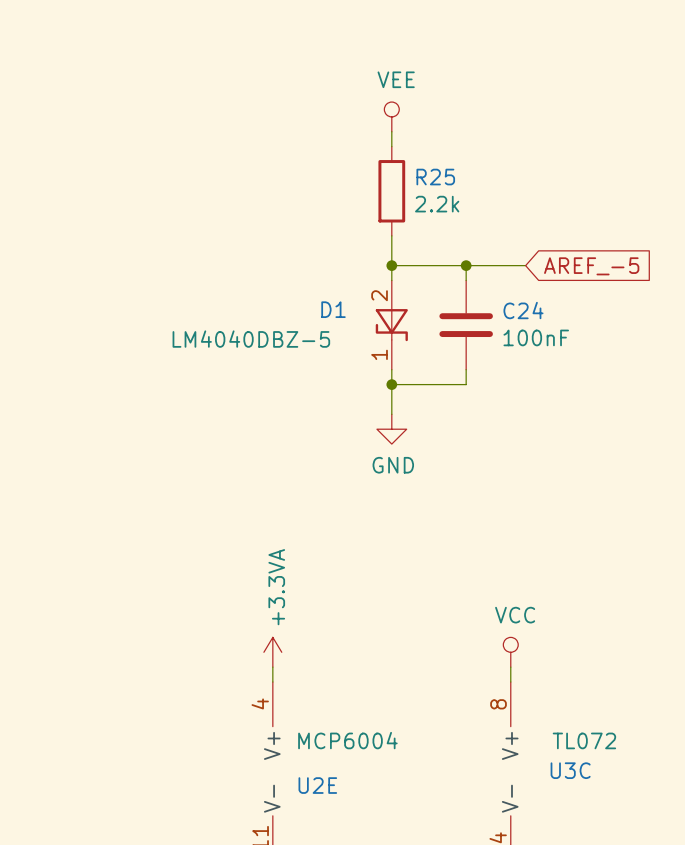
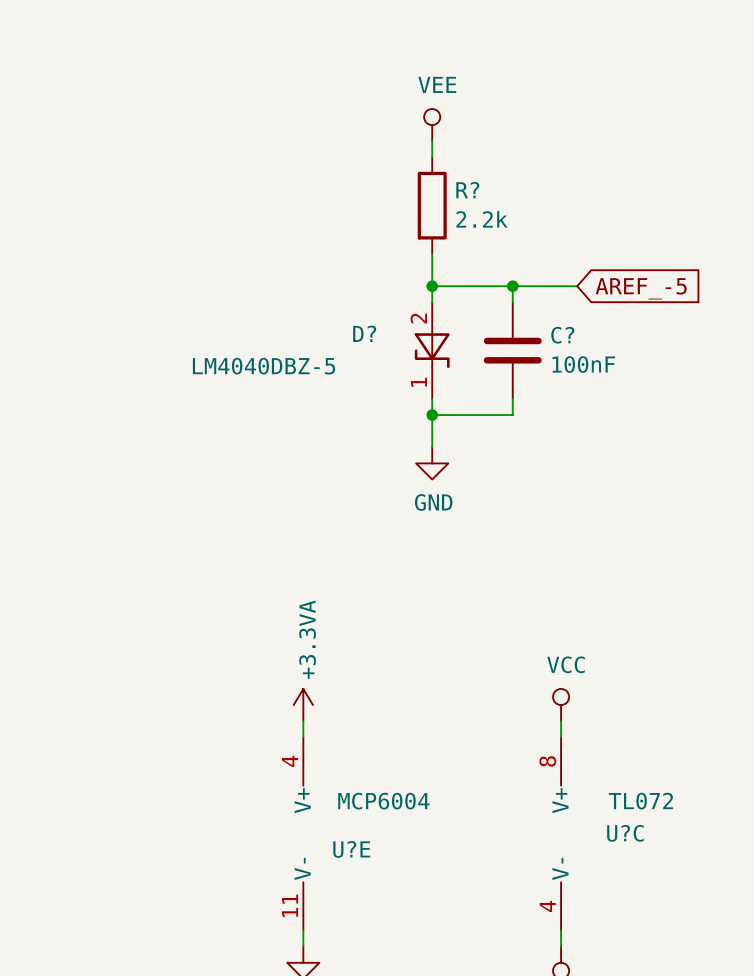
R25 name: R25 (435, 177) -> R? (467, 190)
D1 name: D1 (333, 309) -> D? (364, 333)
C24 name: C24 (523, 310) -> C? (562, 335)
U3C name: U3C (570, 770) -> U?C (625, 833)
U2E name: U2E (317, 785) -> U?E (351, 849)

